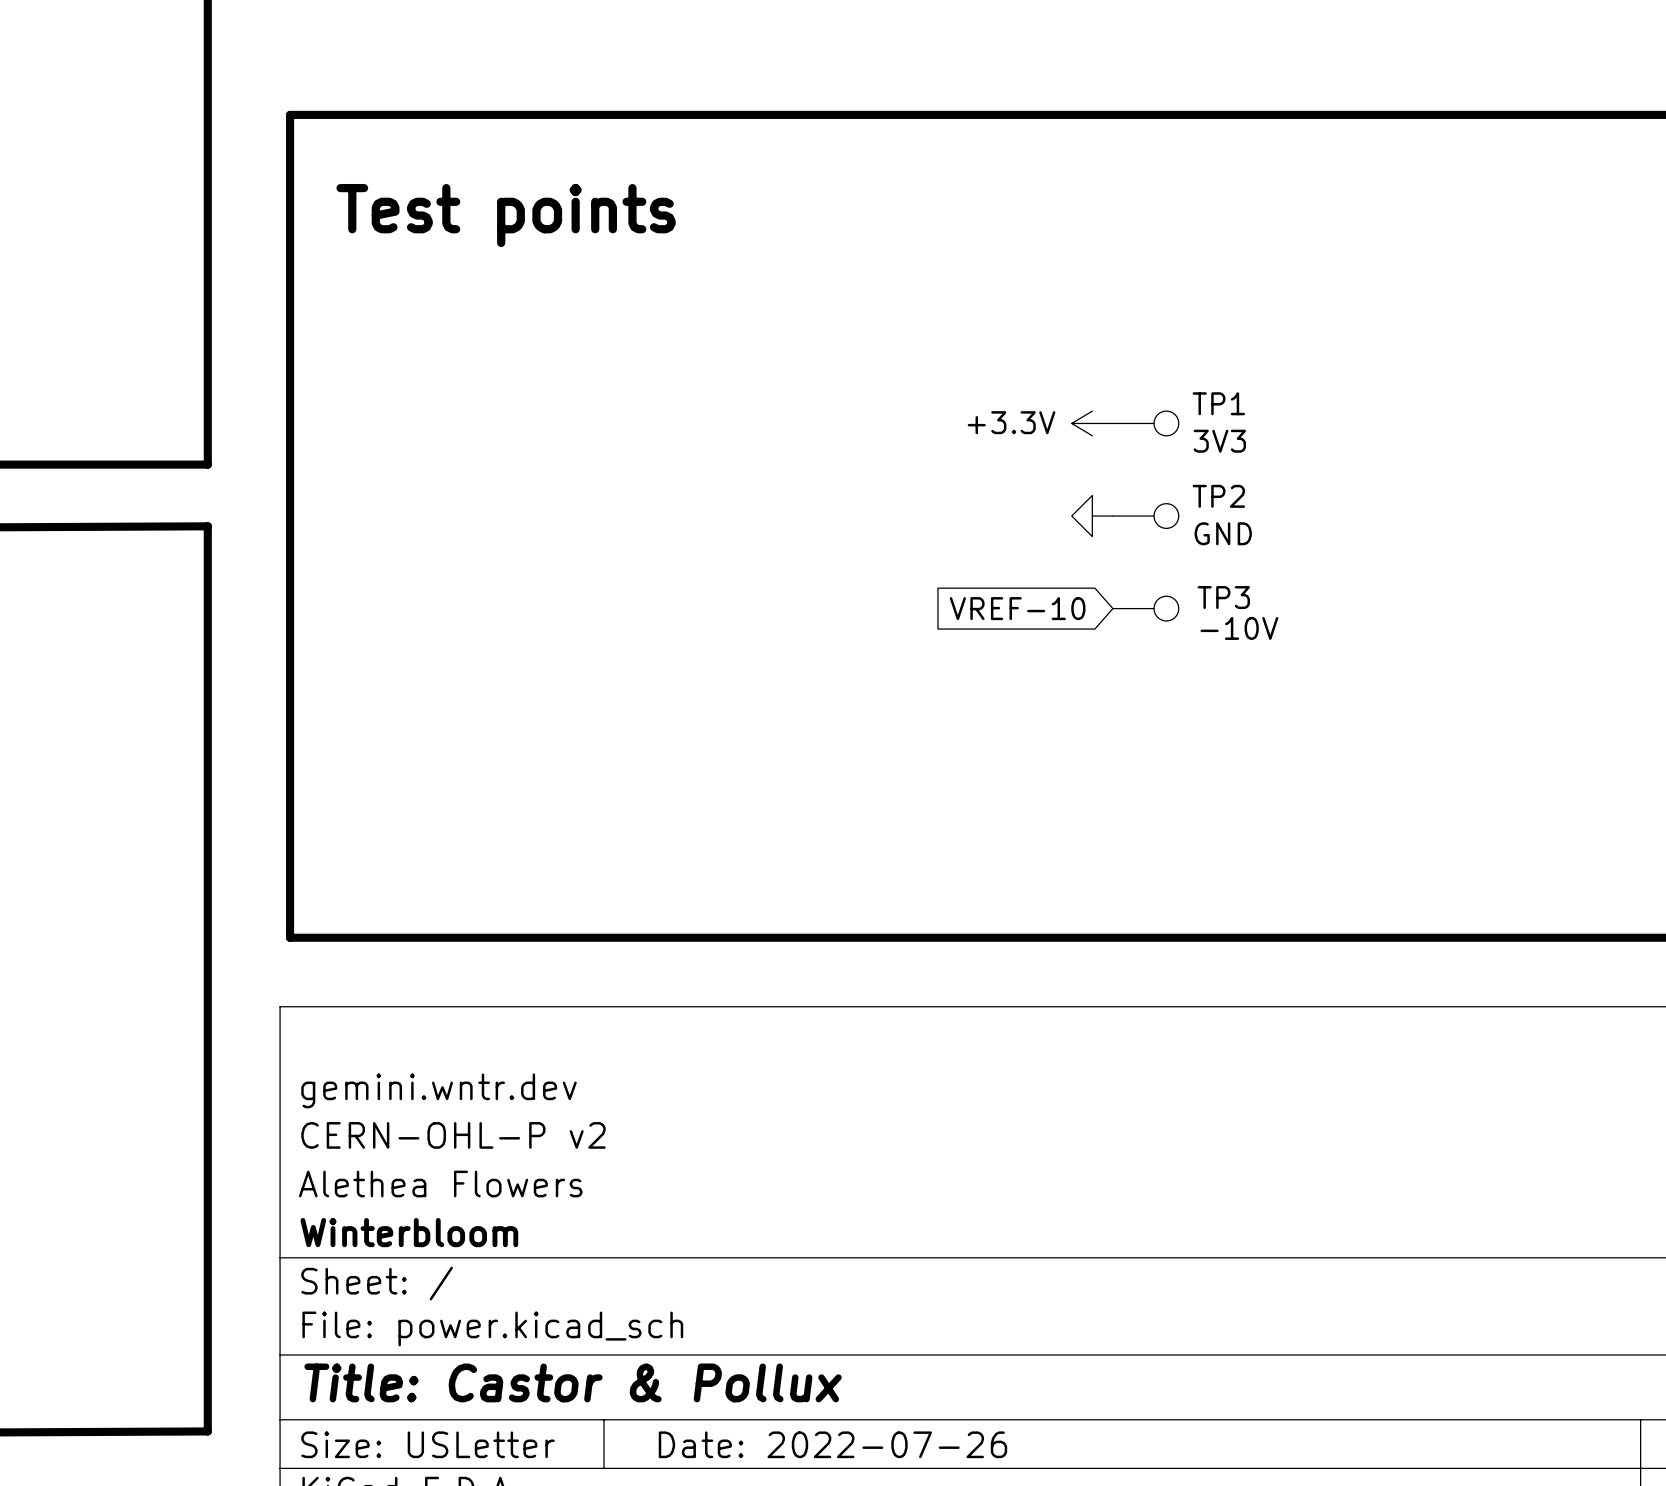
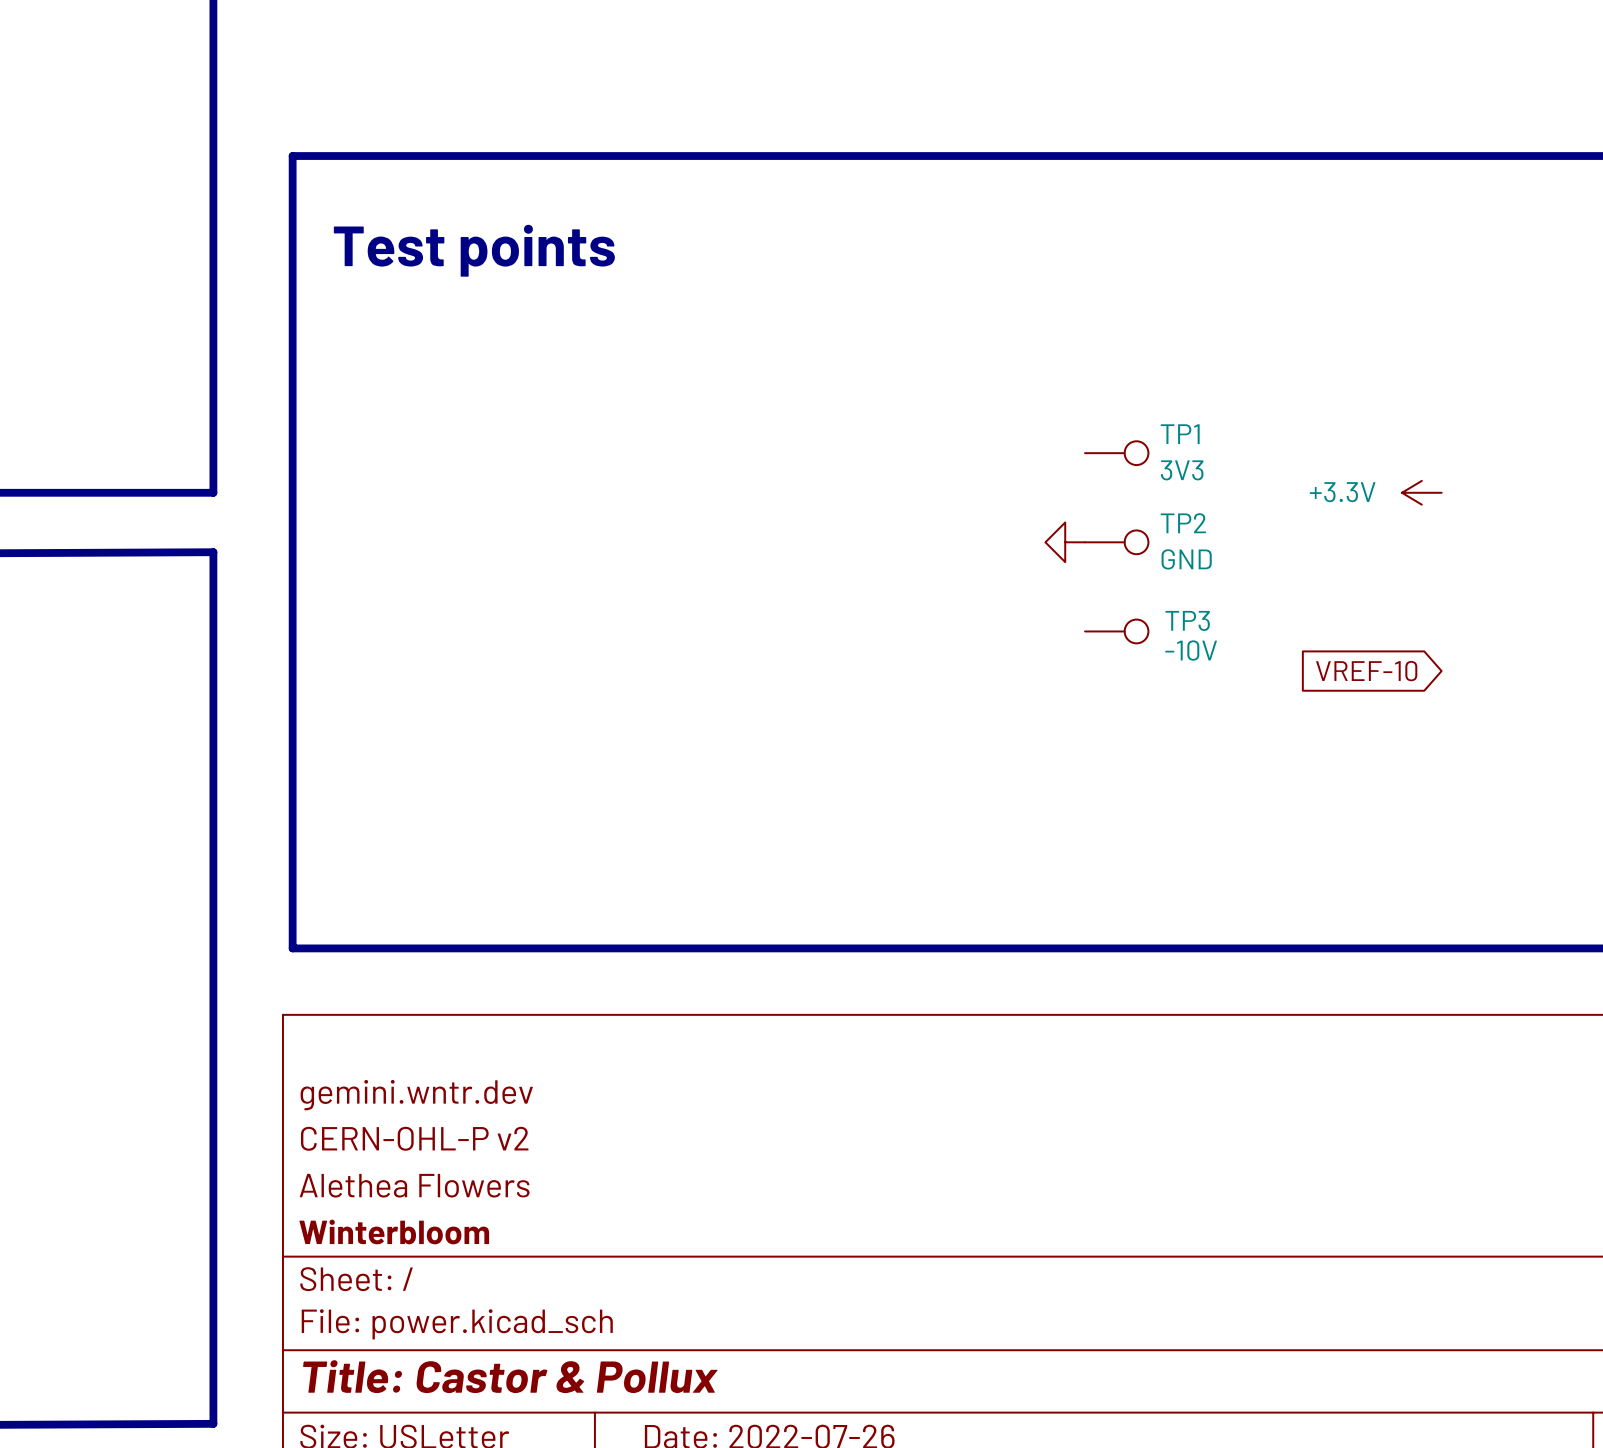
power symbol position: +3.3V (1092, 423) -> +3.3V (1421, 492)
global label position: VREF-10 (1017, 608) -> VREF-10 (1366, 671)

